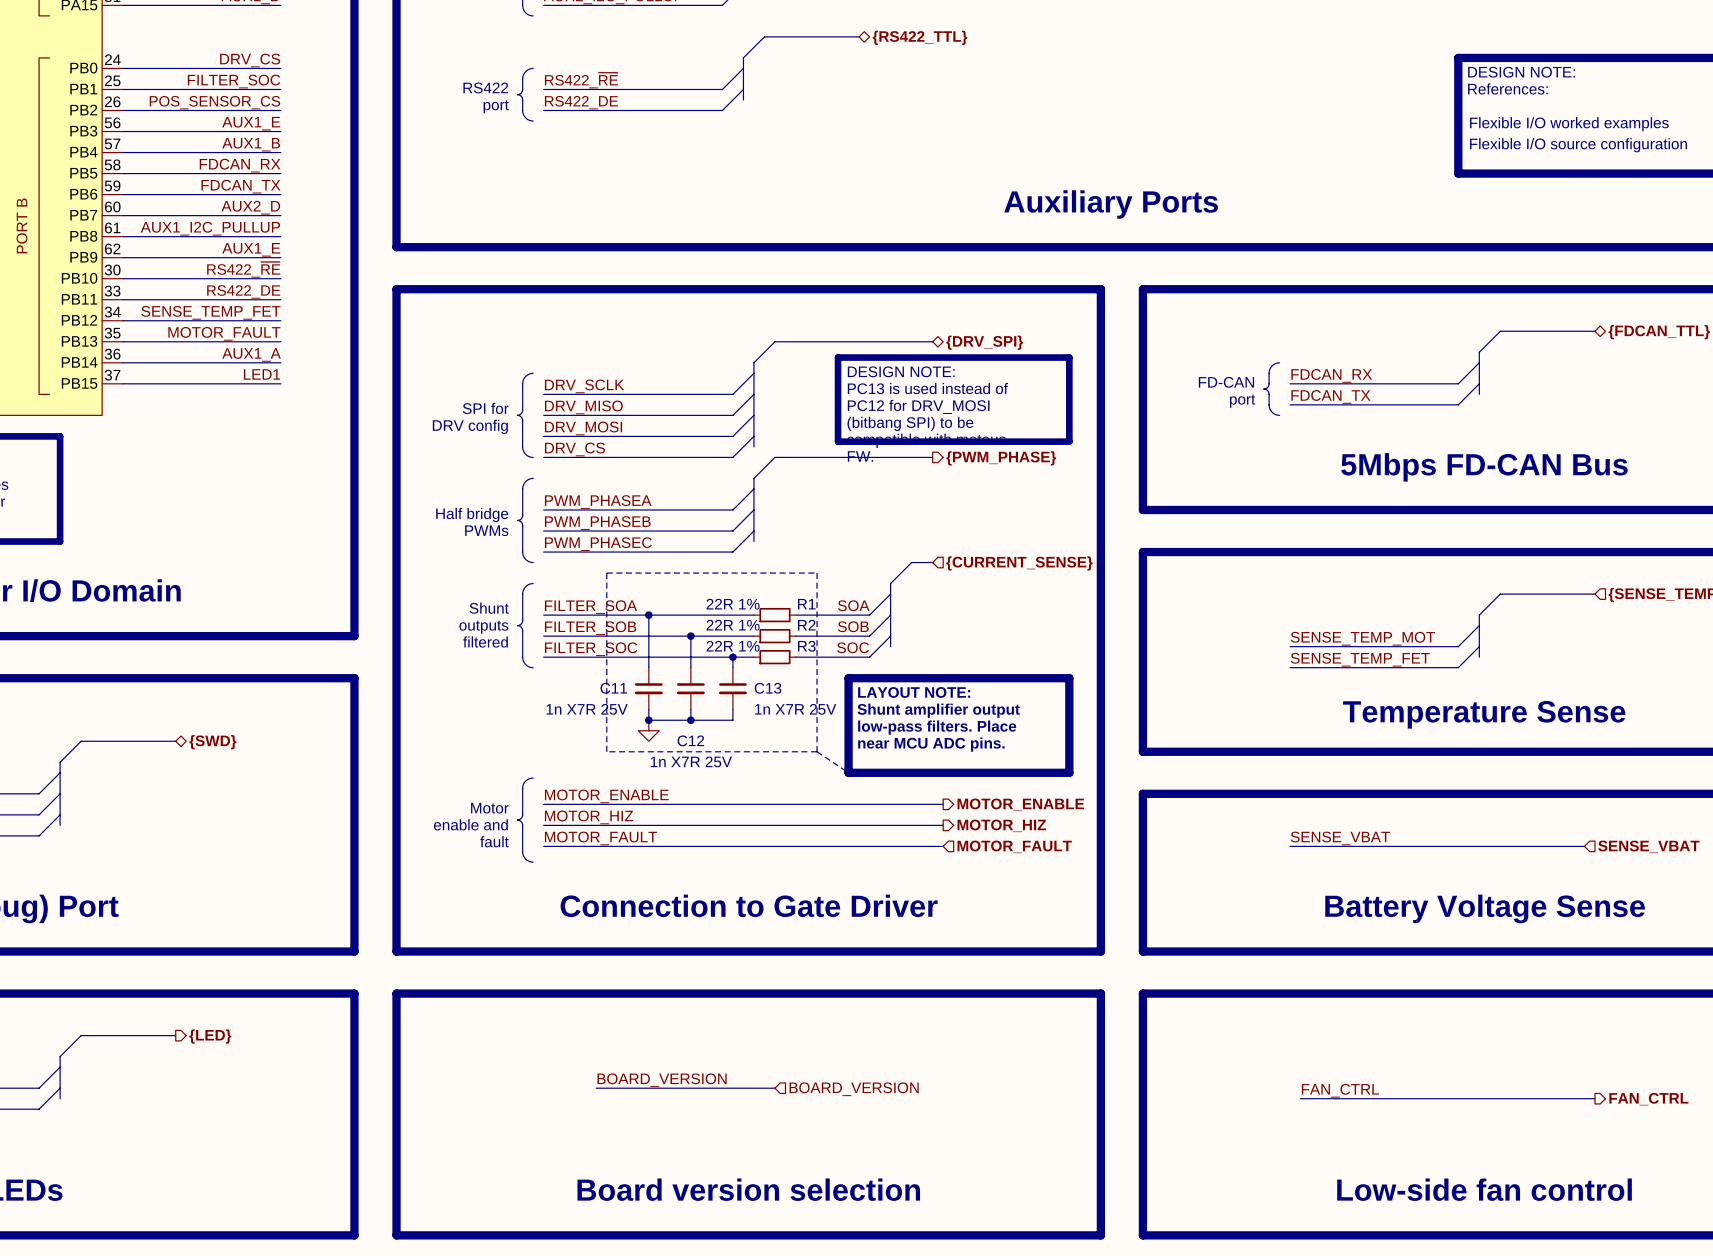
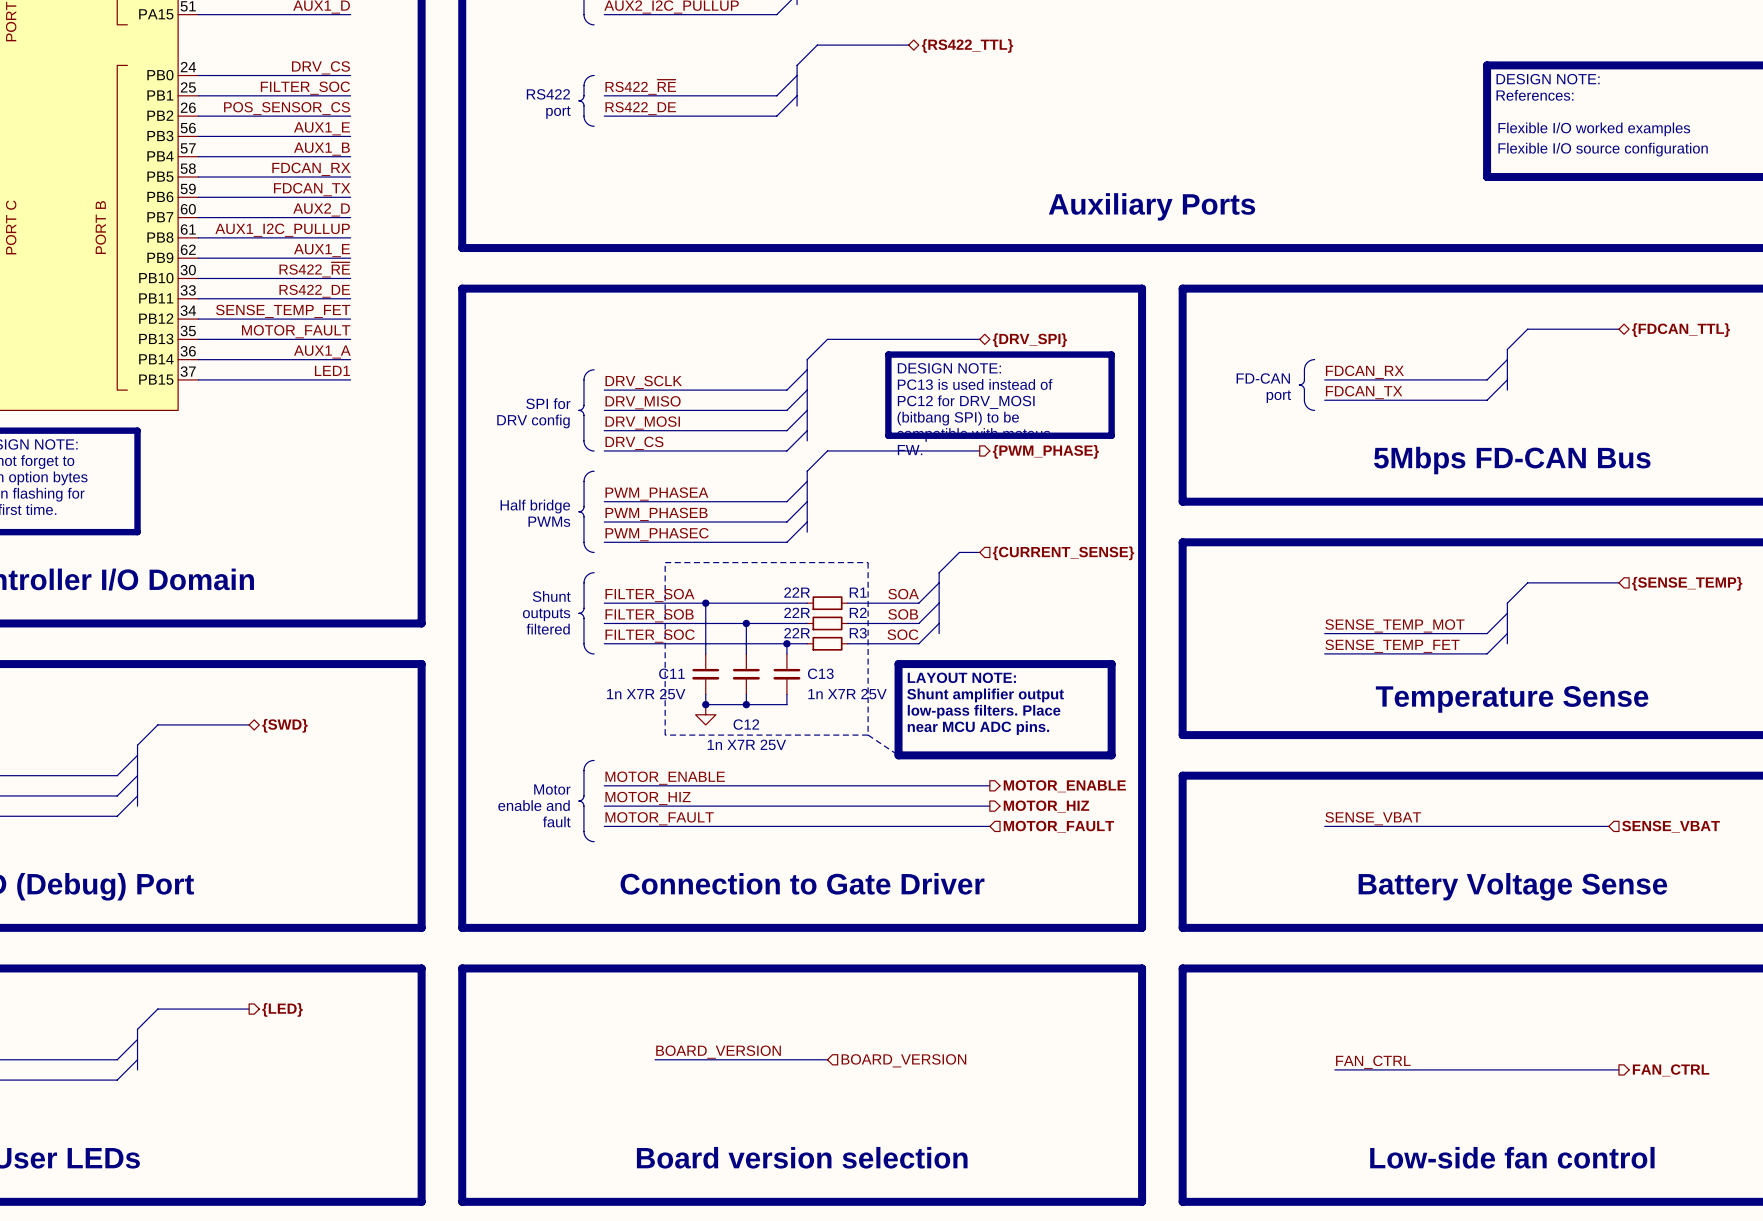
R1 value: 22R 1% (733, 604) -> 22R (797, 592)
R2 value: 22R 1% (733, 625) -> 22R (797, 612)
R3 value: 22R 1% (733, 646) -> 22R (797, 633)

